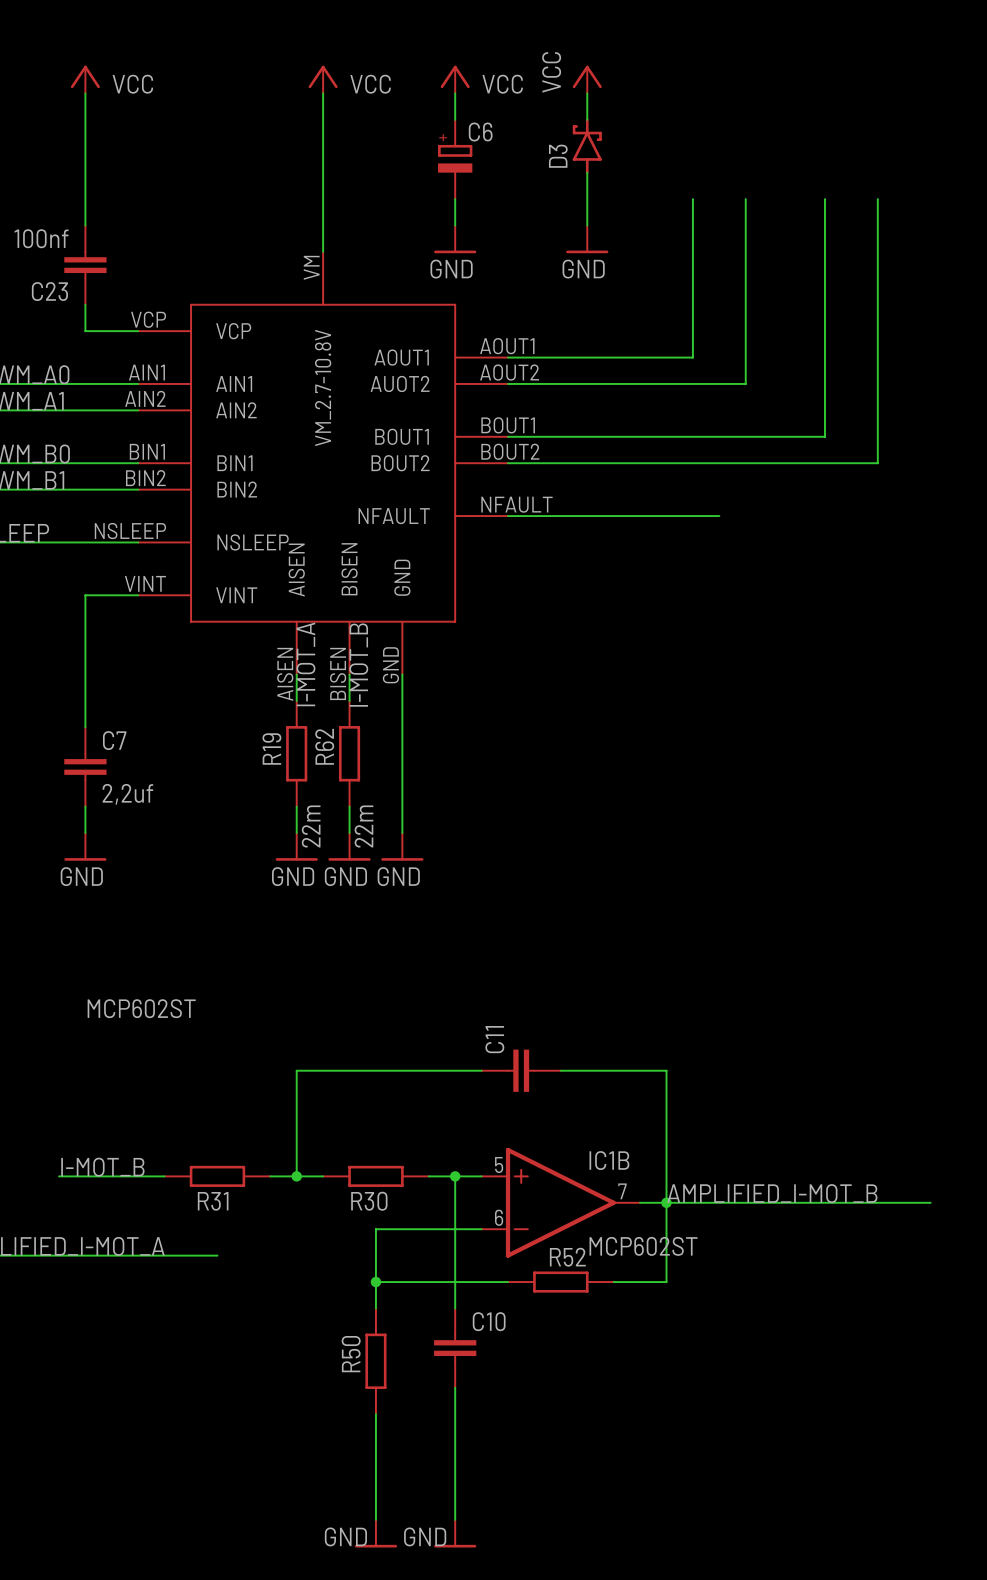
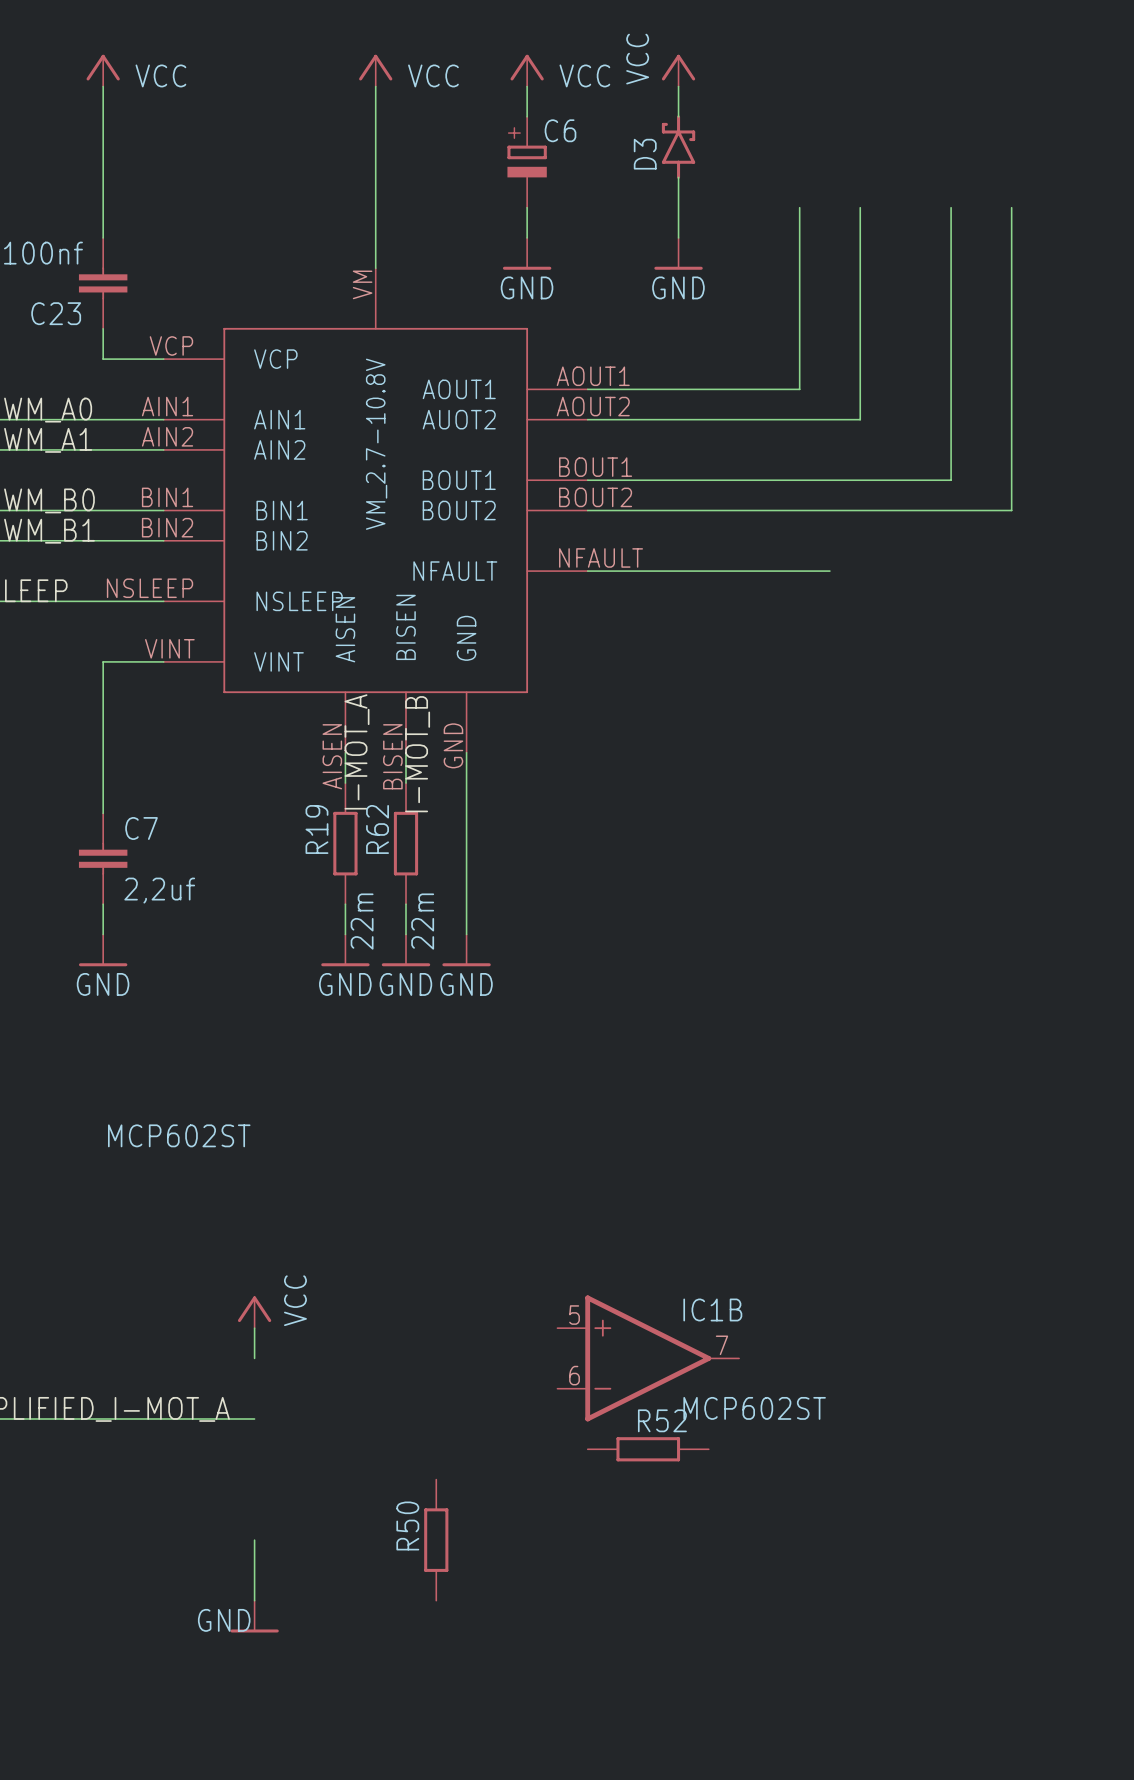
wire: (481, 1070) (296, 1070) (296, 1176) -> none
C11: (521, 1070) -> none
wire: (560, 1070) (666, 1070) (666, 1282) (613, 1282) -> none
power symbol: none -> VCC (254, 1312)
label: I-MOT_B (102, 1167) -> none
wire: (58, 1176) (164, 1176) -> none
wire: none -> (254, 1328) (254, 1358)
R31: (217, 1176) -> none
wire: (270, 1176) (323, 1176) -> none
junction: (296, 1176) -> none
R30: (375, 1176) -> none
wire: (428, 1176) (481, 1176) -> none
wire: (455, 1176) (455, 1308) -> none
junction: (455, 1176) -> none
label: AMPLIFIED_I-MOT_B (772, 1193) -> none
wire: (640, 1202) (930, 1202) -> none
junction: (666, 1202) -> none
wire: (481, 1229) (375, 1229) (375, 1308) -> none
wire: (375, 1282) (508, 1282) -> none
junction: (375, 1282) -> none
C10: (455, 1348) -> none
wire: none -> (254, 1540) (254, 1600)
wire: (455, 1387) (455, 1519) -> none
wire: (375, 1414) (375, 1519) -> none
power symbol: none -> GND (254, 1616)
power symbol: GND (375, 1533) -> none
power symbol: GND (455, 1533) -> none

